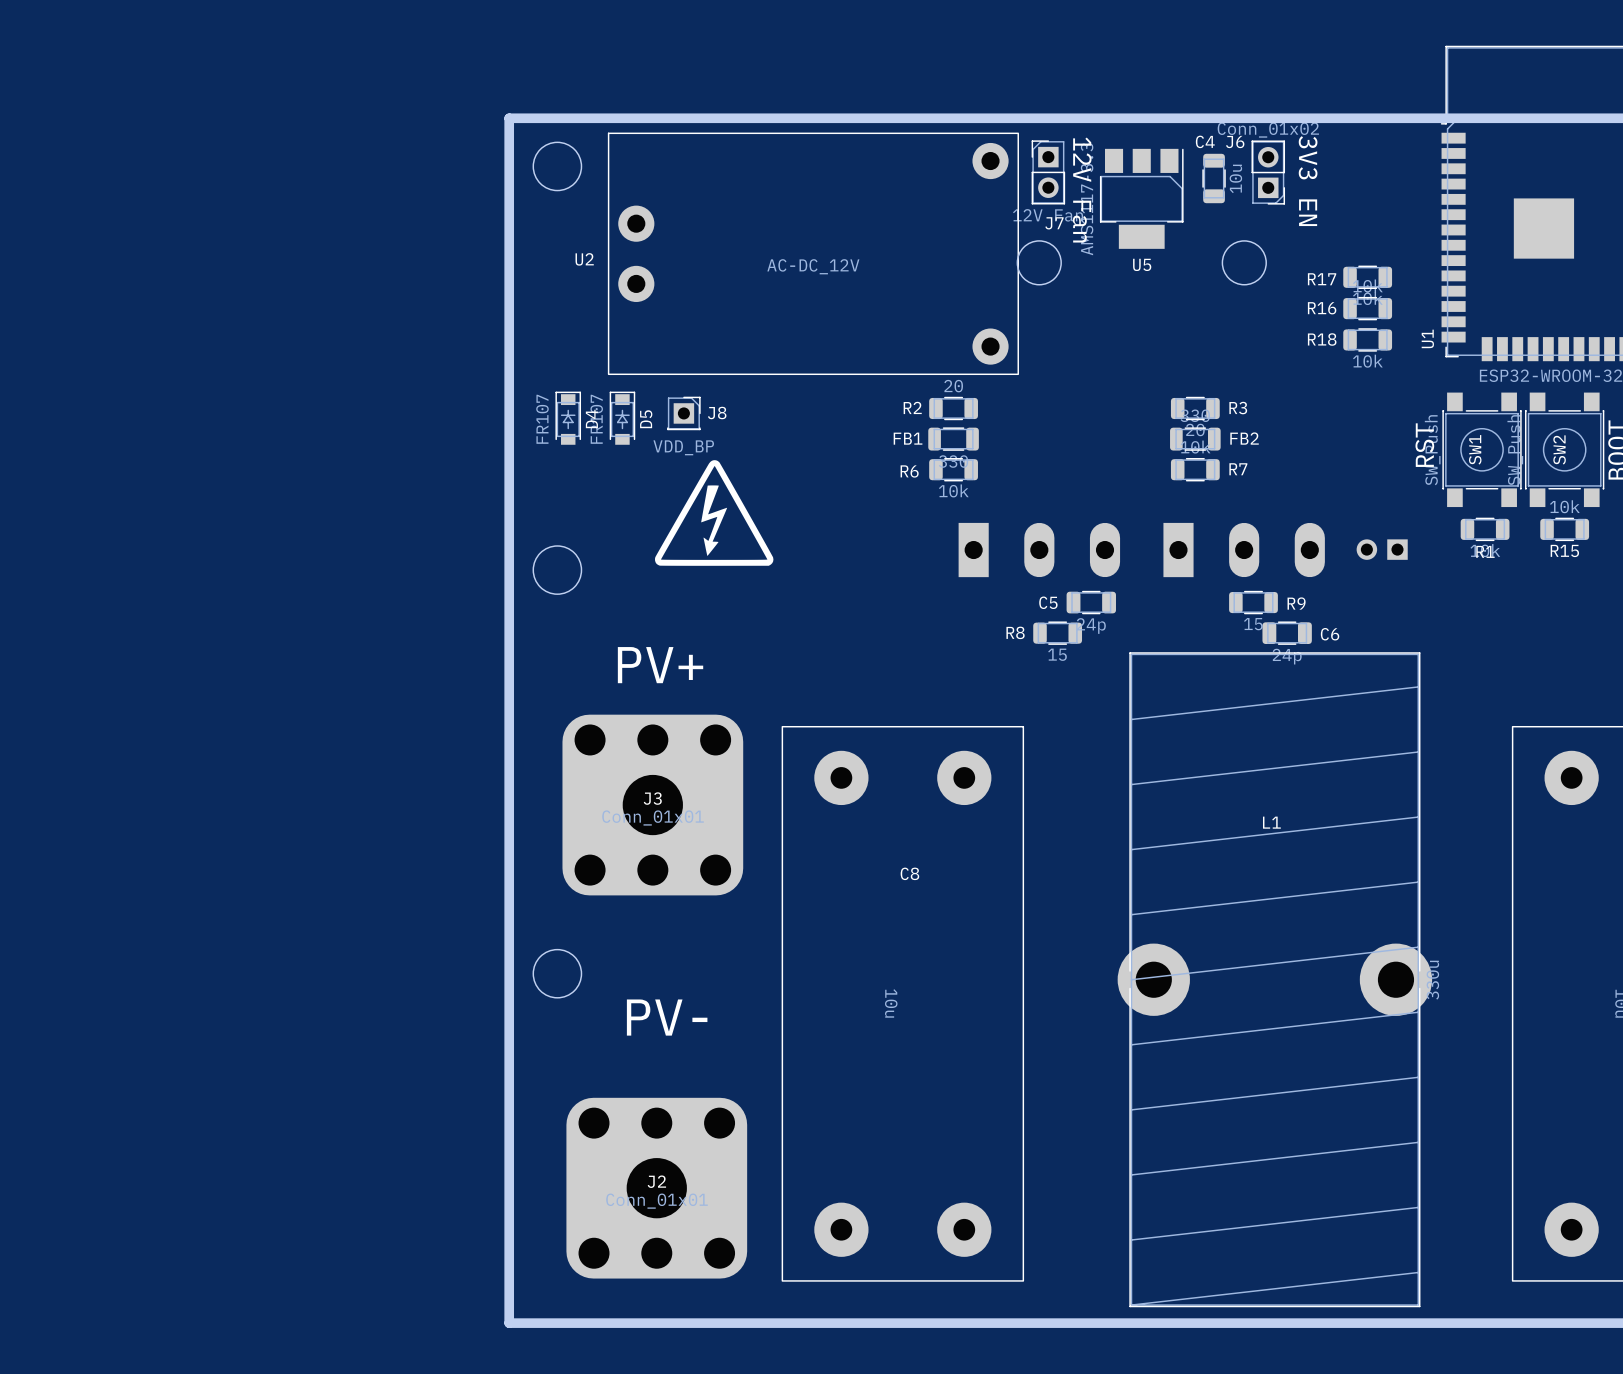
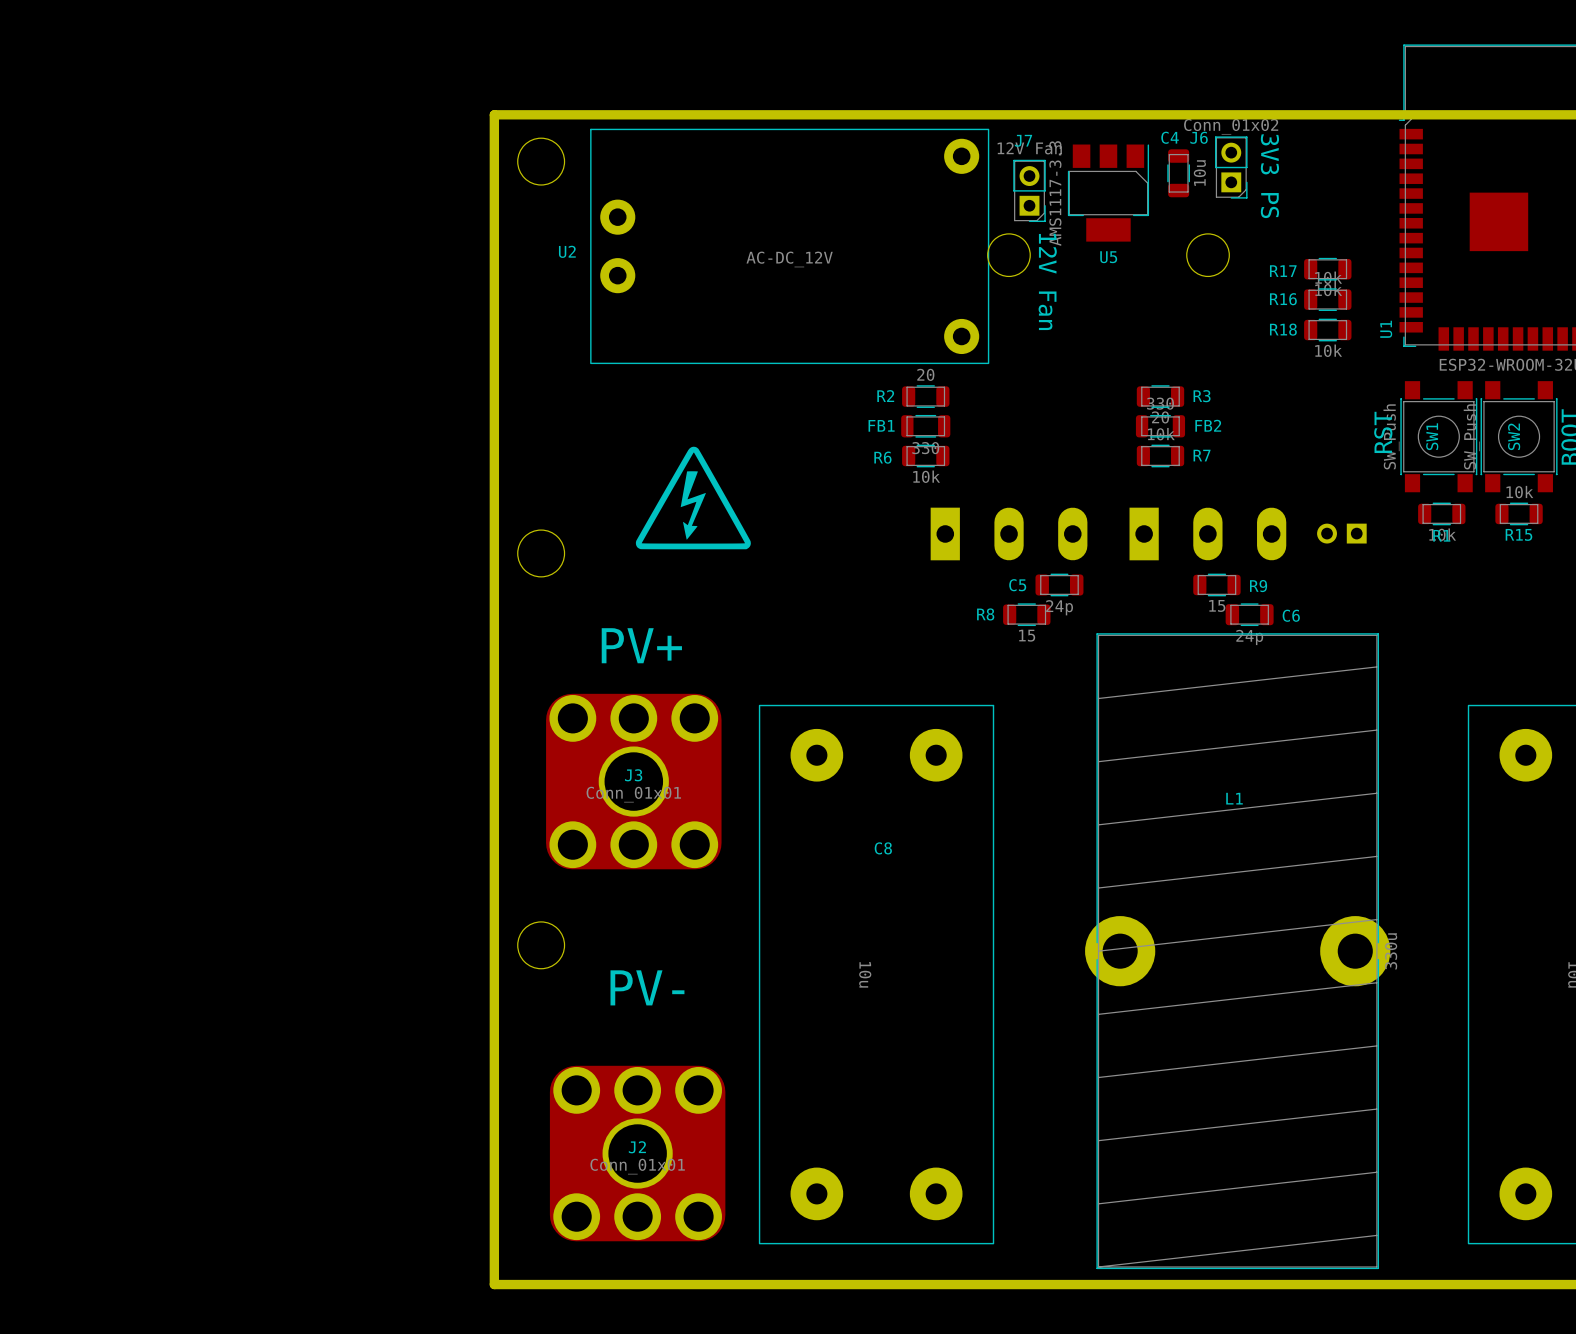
J7 rotation: 0° (1048, 172) -> 180° (1029, 190)
text: 3V3 EN (1308, 181) -> 3V3 PS (1269, 176)
text position: 12V Fan (1082, 190) -> 12V Fan (1047, 281)
J8: VDD_BP (683, 413) -> none
D4: FR107 (568, 418) -> none
D5: FR107 (622, 418) -> none

